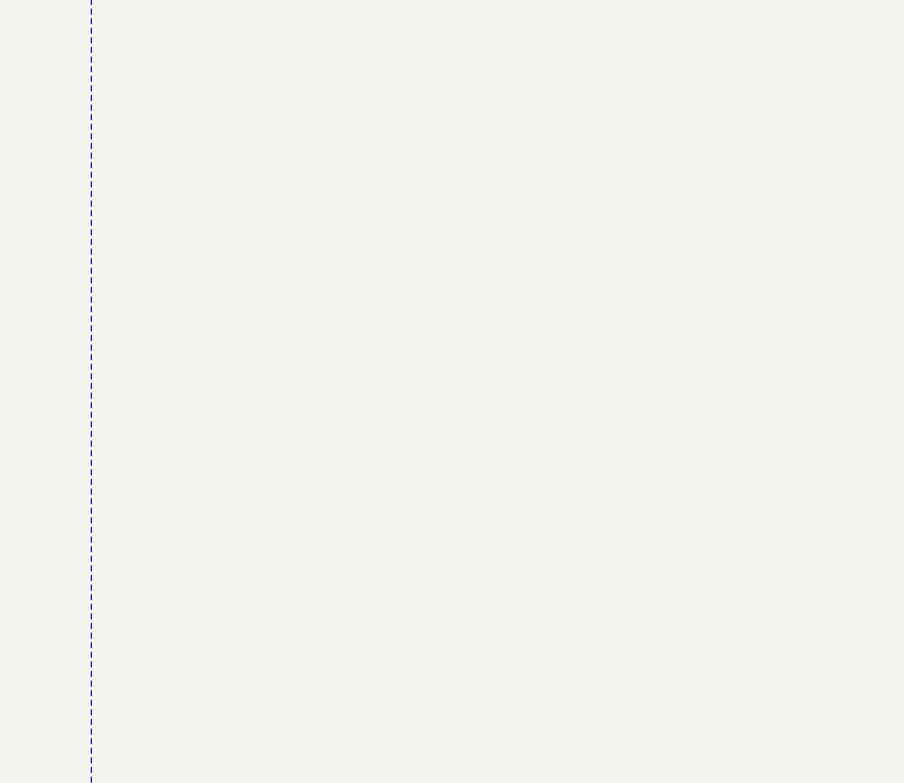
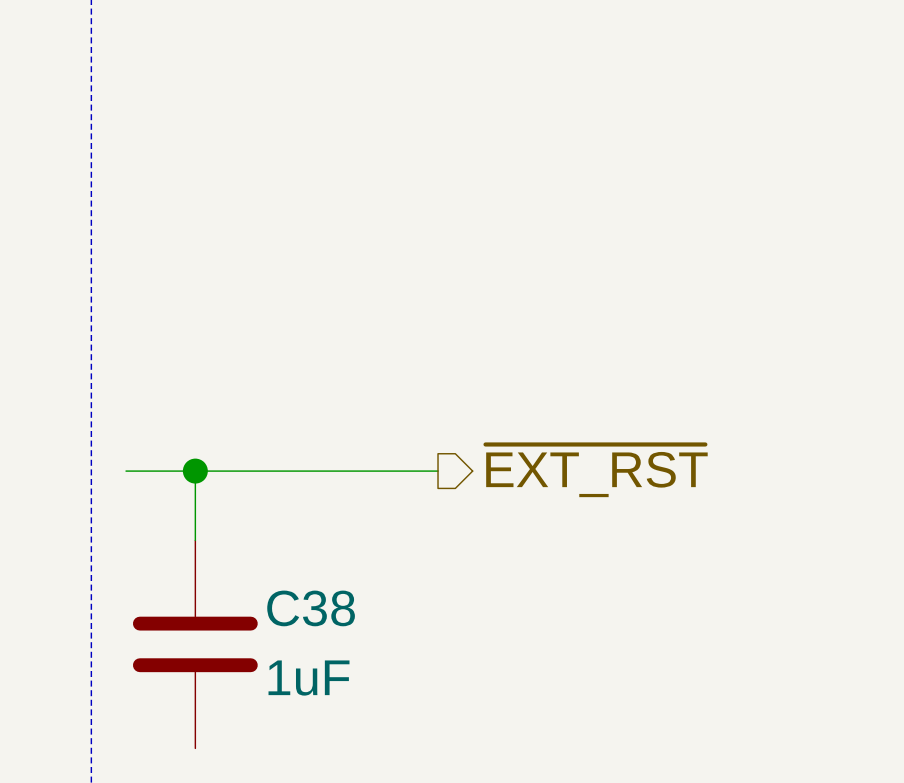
hierarchical label: none -> ~{EXT_RST} (596, 470)
wire: none -> (126, 471) (438, 471)
wire: none -> (195, 471) (195, 540)
junction: none -> (195, 471)
C38: none -> 1uF (195, 644)

